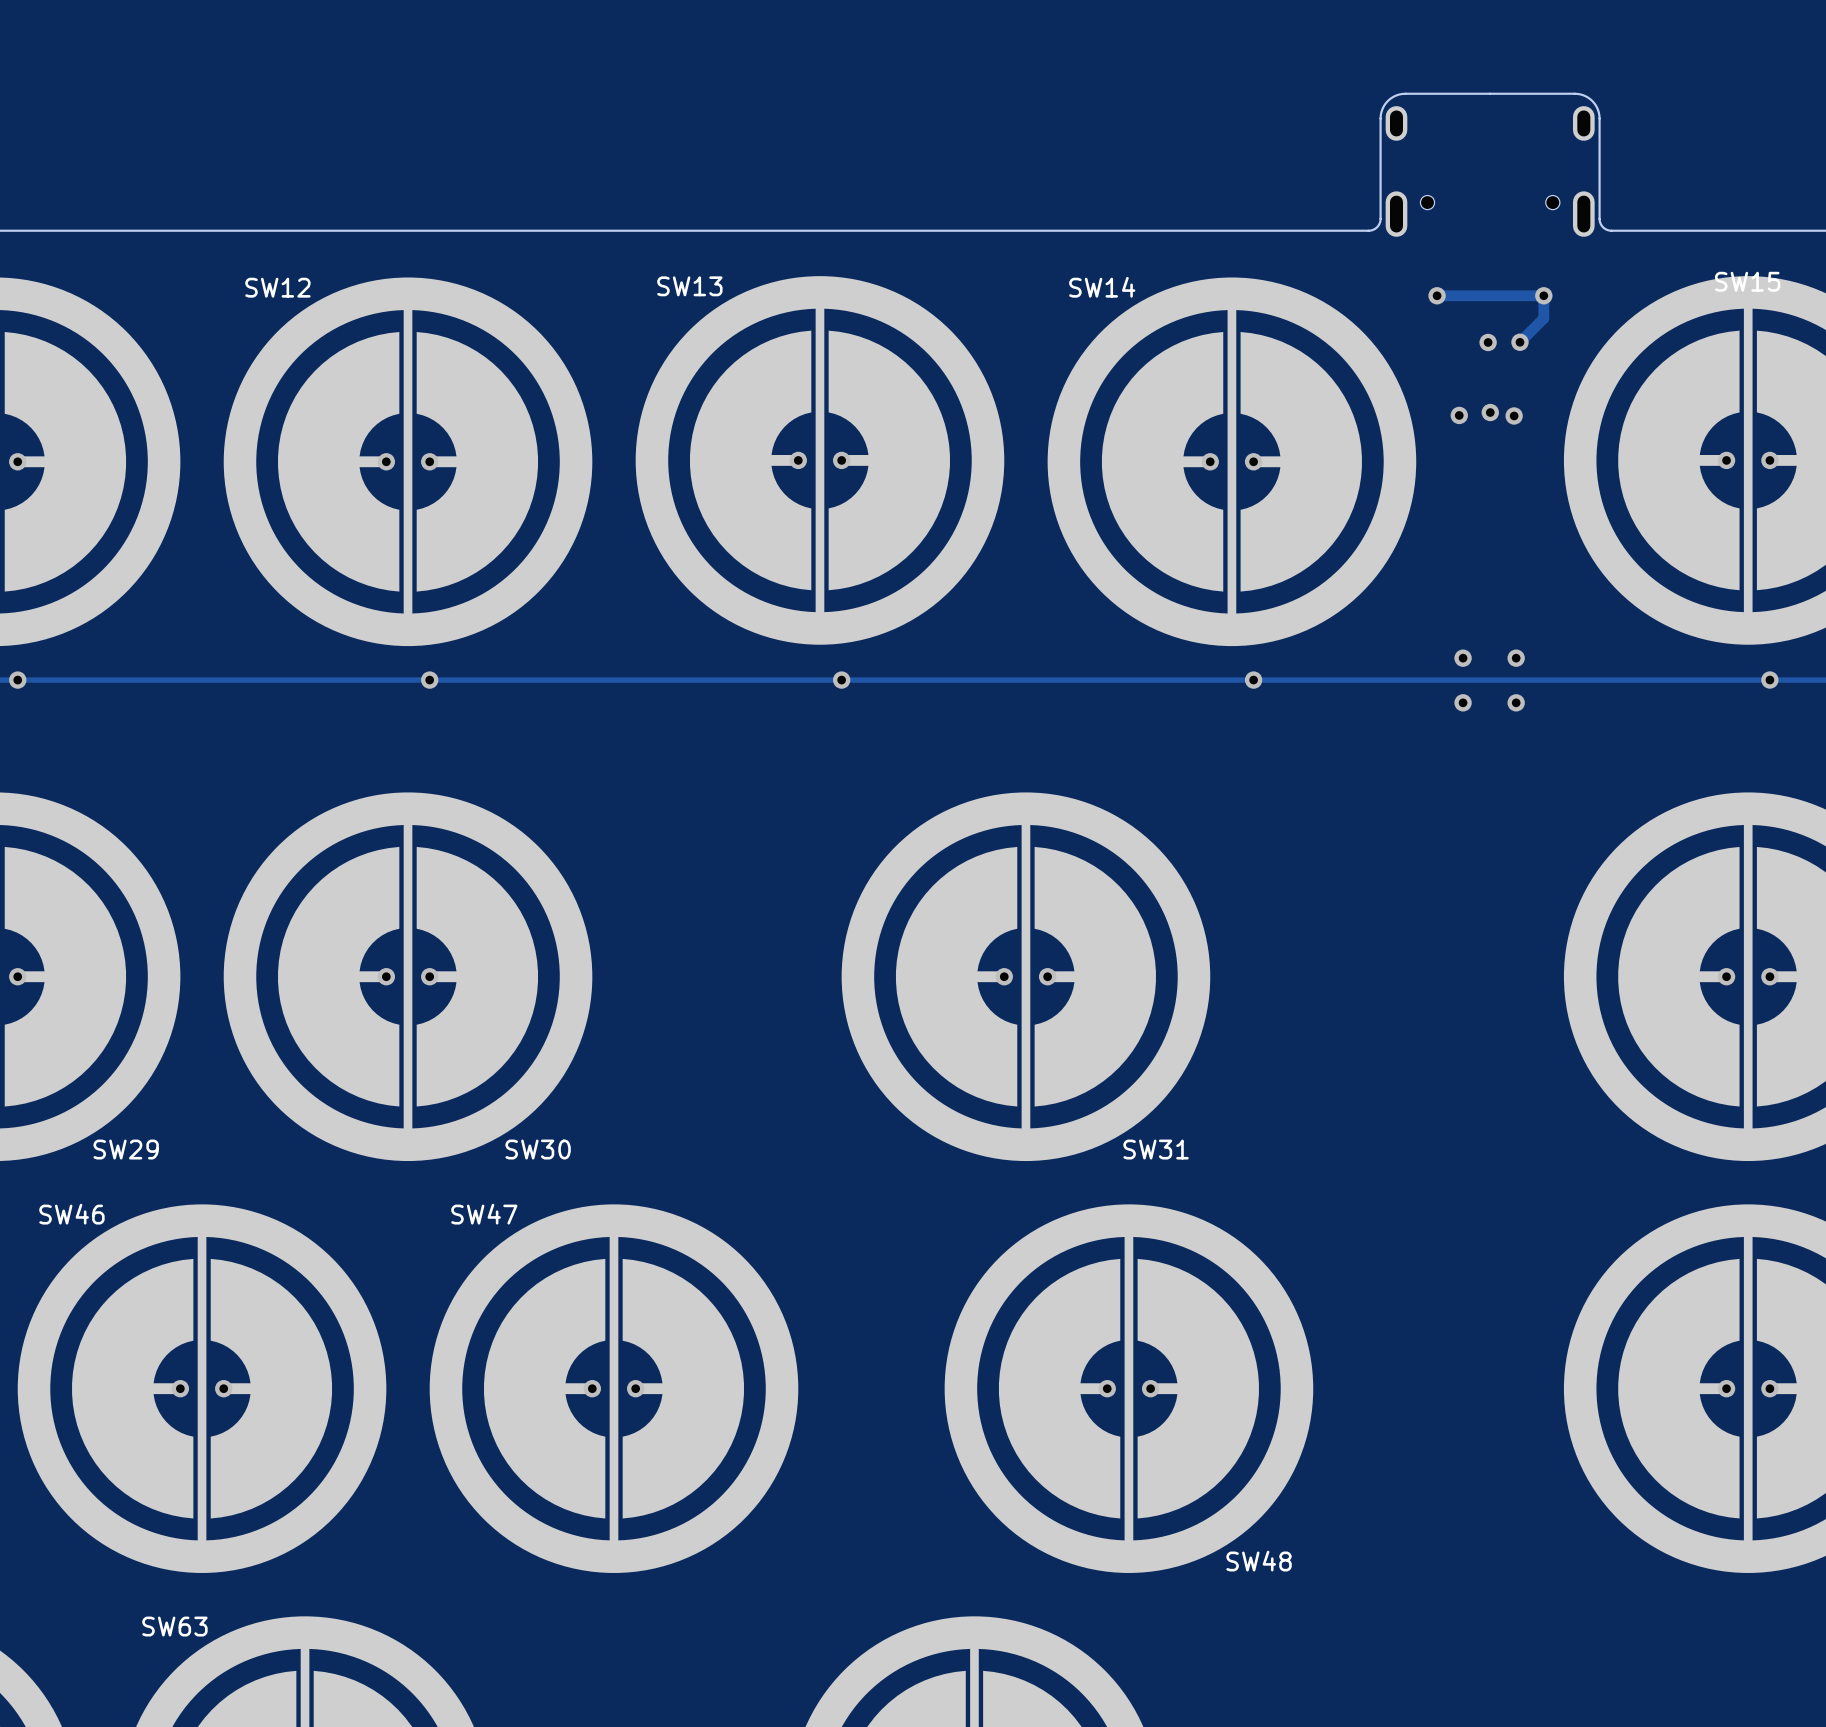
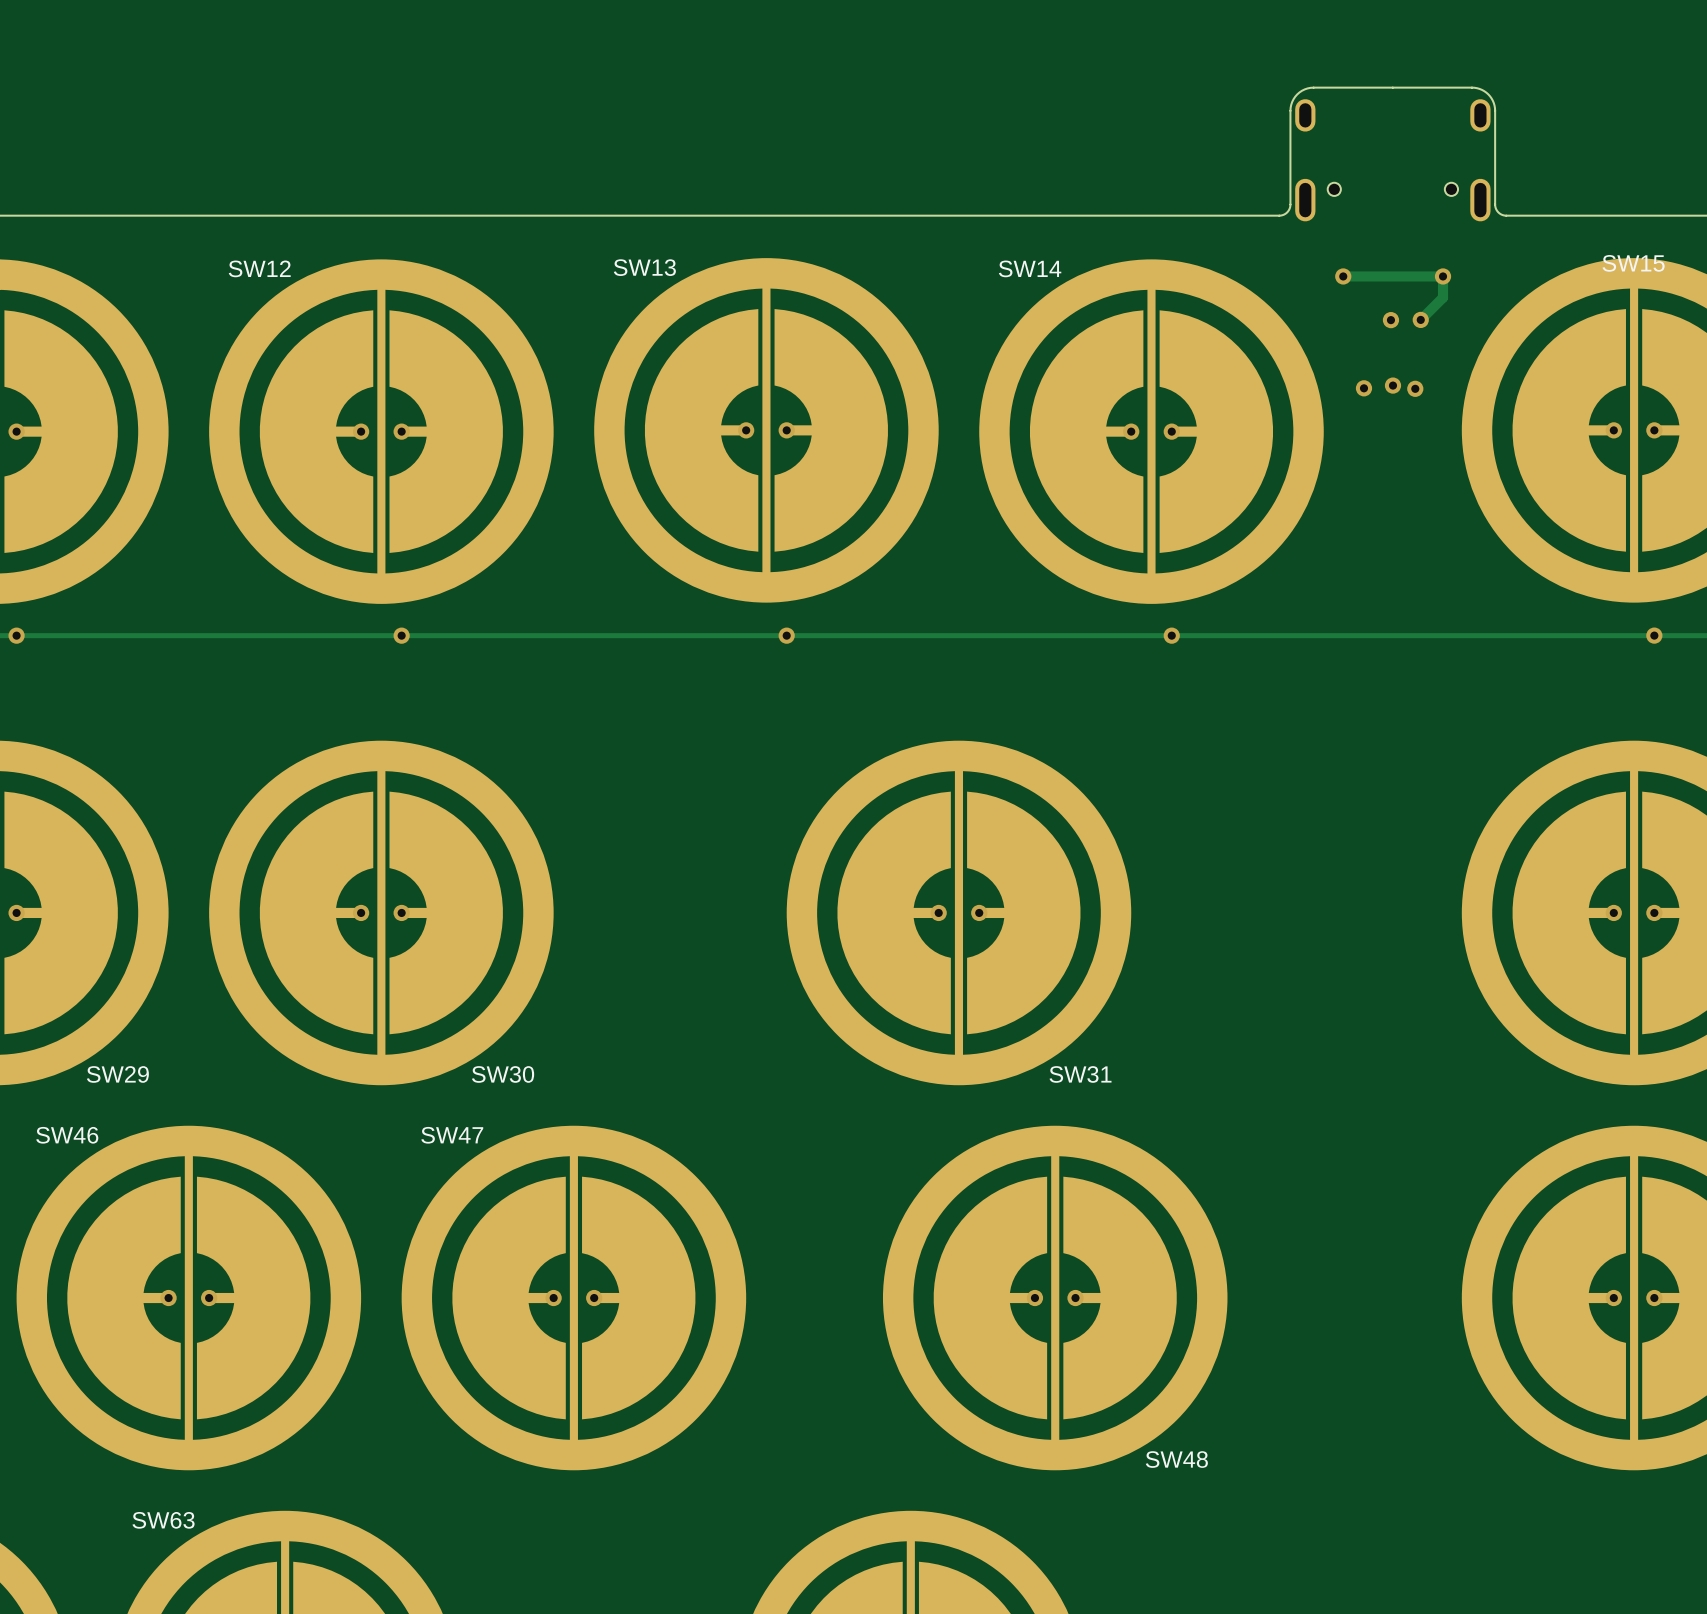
via: (1463, 658) -> none
via: (1516, 658) -> none
via: (1463, 702) -> none
via: (1516, 702) -> none

